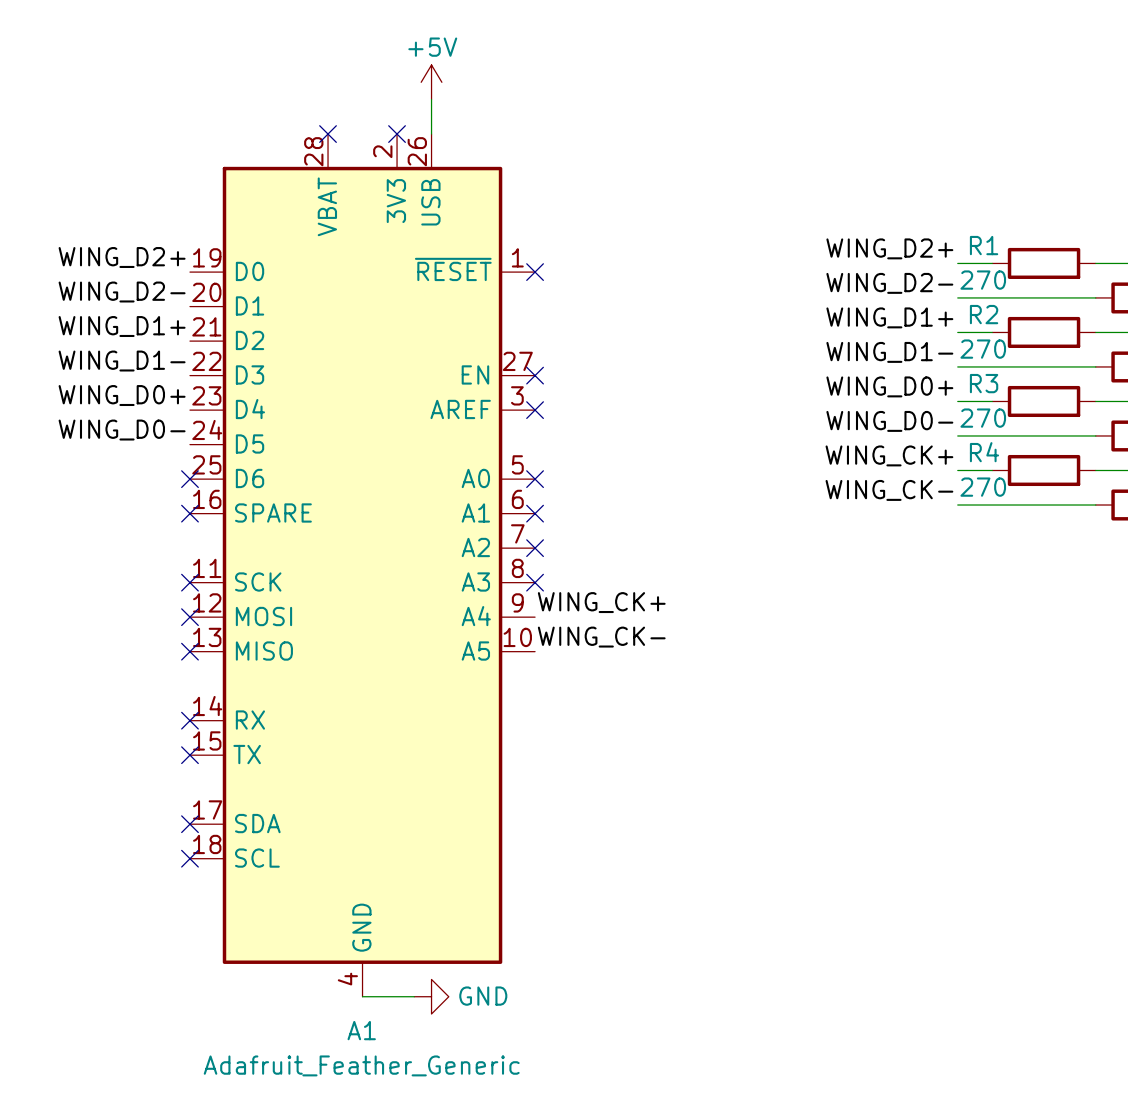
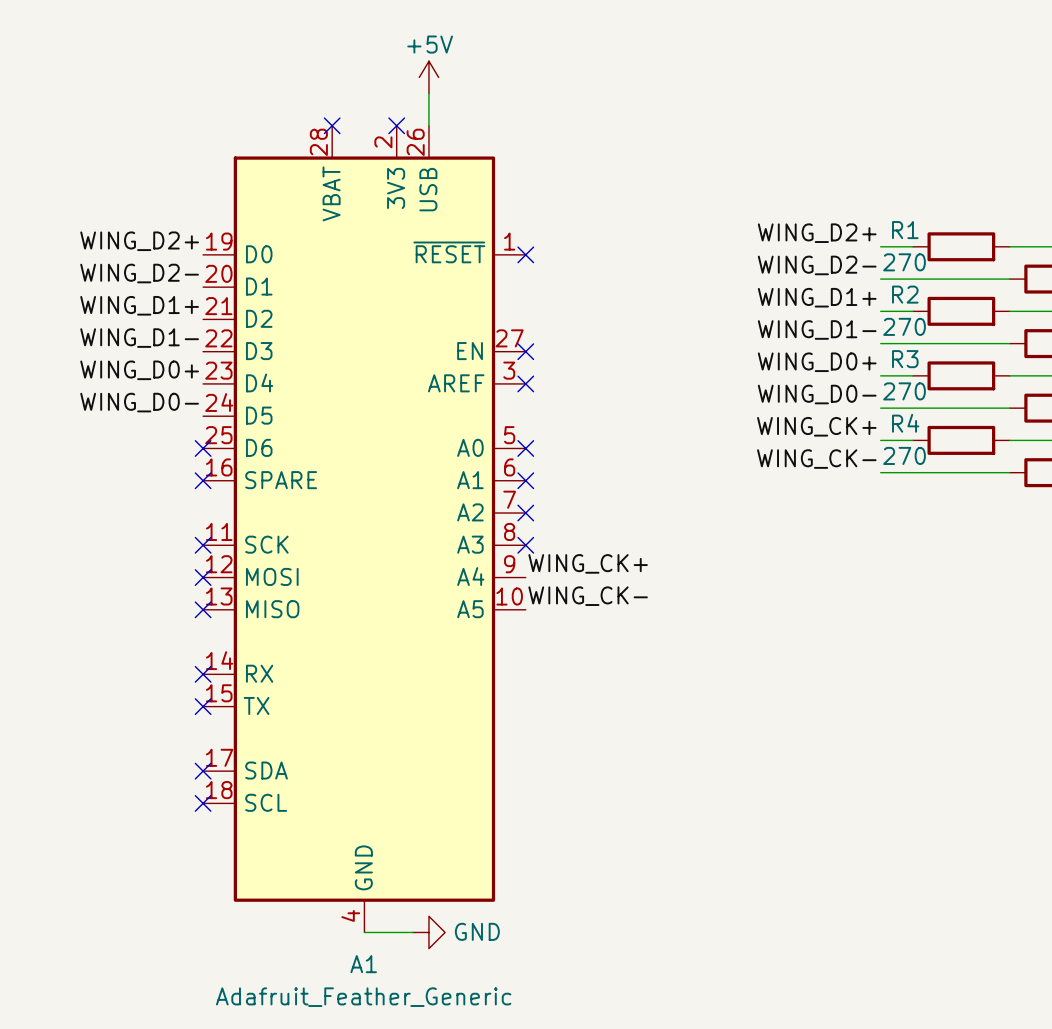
power symbol position: +5V (431, 82) -> +5V (428, 77)
wire: (431, 99) (431, 134) -> (428, 93) (428, 125)
no-connect mark: (328, 134) -> none
no-connect mark: none -> (332, 125)
no-connect mark: (397, 134) -> none
no-connect mark: none -> (396, 125)
label position: WING_D2+ (122, 257) -> WING_D2+ (139, 241)
no-connect mark position: (535, 272) -> (525, 254)
label position: WING_D2- (122, 292) -> WING_D2- (139, 273)
label position: WING_D1+ (122, 326) -> WING_D1+ (139, 305)
label position: WING_D1- (122, 361) -> WING_D1- (139, 338)
no-connect mark: (535, 375) -> none
no-connect mark: none -> (525, 351)
label position: WING_D0+ (122, 395) -> WING_D0+ (139, 370)
no-connect mark: (535, 410) -> none
no-connect mark: none -> (525, 383)
label position: WING_D0- (122, 430) -> WING_D0- (139, 402)
no-connect mark: (189, 479) -> none
no-connect mark: none -> (203, 448)
no-connect mark: (535, 479) -> none
no-connect mark: none -> (525, 448)
no-connect mark: (189, 513) -> none
no-connect mark: none -> (203, 480)
no-connect mark: (535, 513) -> none
no-connect mark: none -> (525, 480)
no-connect mark: (535, 548) -> none
no-connect mark: none -> (525, 513)
A1 position: (362, 565) -> (364, 529)
no-connect mark: (189, 582) -> none
no-connect mark: none -> (203, 545)
no-connect mark: (535, 582) -> none
no-connect mark: none -> (525, 545)
label position: WING_CK+ (601, 602) -> WING_CK+ (588, 563)
no-connect mark: (189, 617) -> none
no-connect mark: none -> (203, 577)
label position: WING_CK- (601, 637) -> WING_CK- (588, 596)
no-connect mark: (189, 651) -> none
no-connect mark: none -> (203, 609)
no-connect mark: (189, 720) -> none
no-connect mark: none -> (203, 674)
no-connect mark: (189, 755) -> none
no-connect mark: none -> (203, 706)
no-connect mark: (189, 824) -> none
no-connect mark: none -> (203, 771)
no-connect mark: (189, 858) -> none
no-connect mark: none -> (203, 803)
wire: (362, 996) (405, 996) -> (372, 932) (412, 932)
power symbol position: GND (431, 996) -> GND (428, 932)

